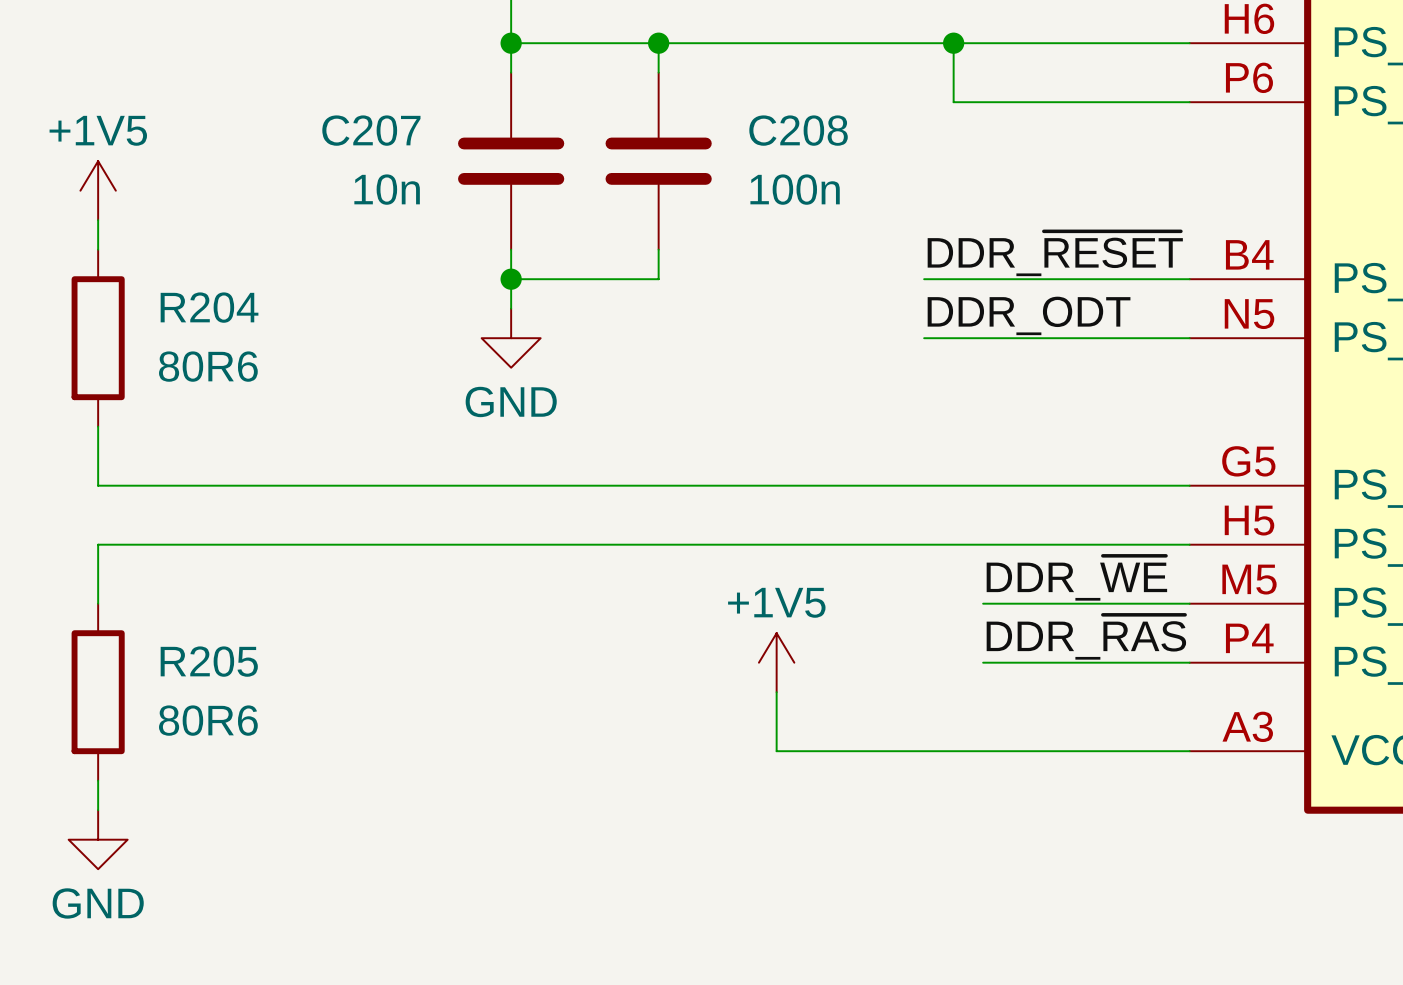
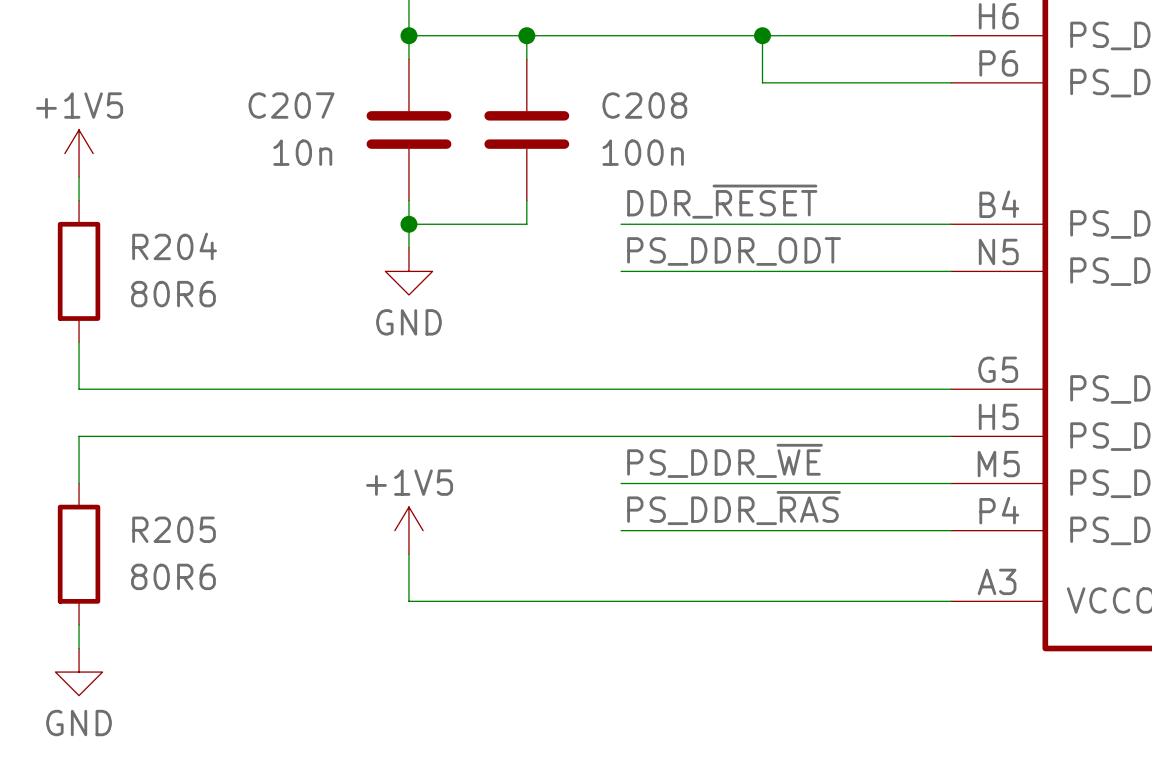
label position: DDR_~{RESET} (1055, 253) -> DDR_~{RESET} (722, 201)
wire: none -> (621, 224) (738, 224)
label: DDR_ODT (1029, 315) -> PS_DDR_ODT (734, 251)
wire: none -> (621, 271) (738, 271)
label: none -> PS_DDR_~{WE} (725, 460)
label: DDR_~{WE} (1076, 578) -> none
wire: none -> (621, 483) (786, 483)
label: none -> PS_DDR_~{RAS} (734, 508)
label: DDR_~{RAS} (1086, 637) -> none
wire: none -> (621, 530) (786, 530)
power symbol position: +1V5 (776, 662) -> +1V5 (408, 530)
wire: (776, 692) (776, 751) -> (408, 554) (408, 601) (621, 601)

